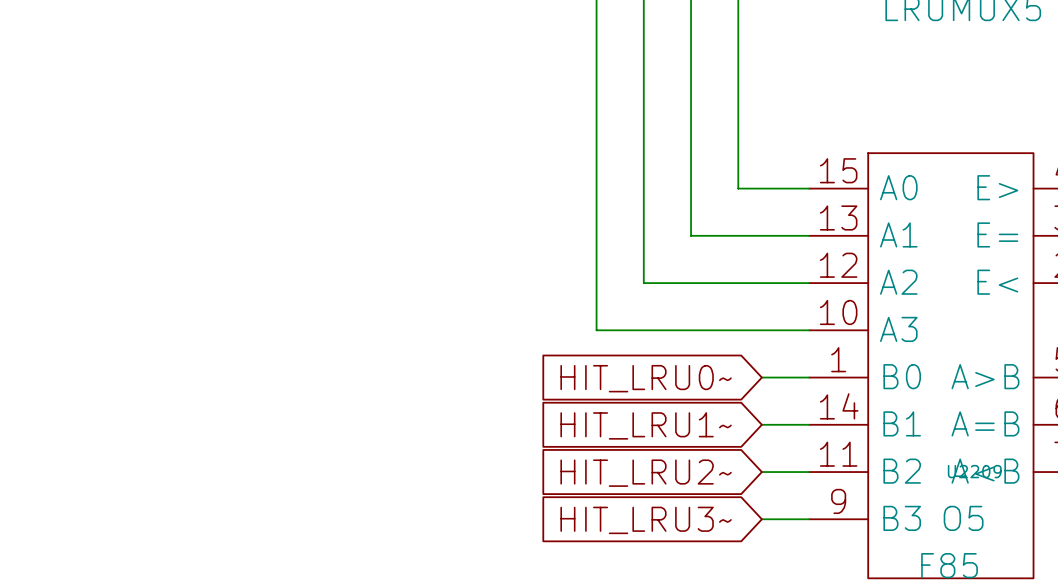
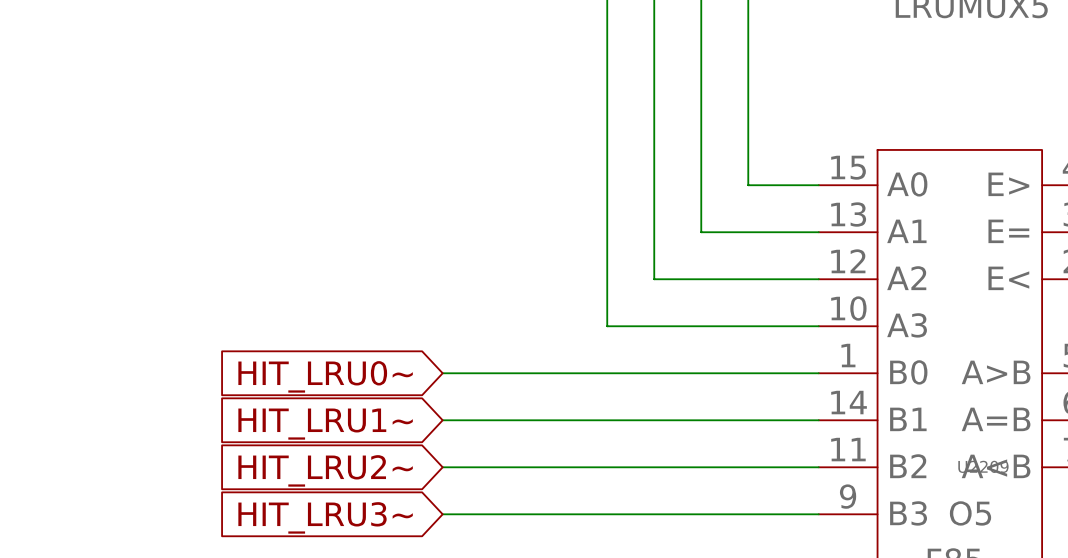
wire: none -> (442, 373) (771, 373)
global label: none -> HIT_LRU0~ (325, 376)
global label: HIT_LRU0~ (646, 378) -> none
wire: none -> (442, 420) (771, 420)
global label: none -> HIT_LRU1~ (325, 424)
global label: HIT_LRU1~ (646, 425) -> none
wire: none -> (442, 467) (771, 467)
global label: none -> HIT_LRU2~ (325, 470)
global label: HIT_LRU2~ (646, 473) -> none
wire: none -> (442, 514) (771, 514)
global label: none -> HIT_LRU3~ (325, 517)
global label: HIT_LRU3~ (646, 520) -> none

